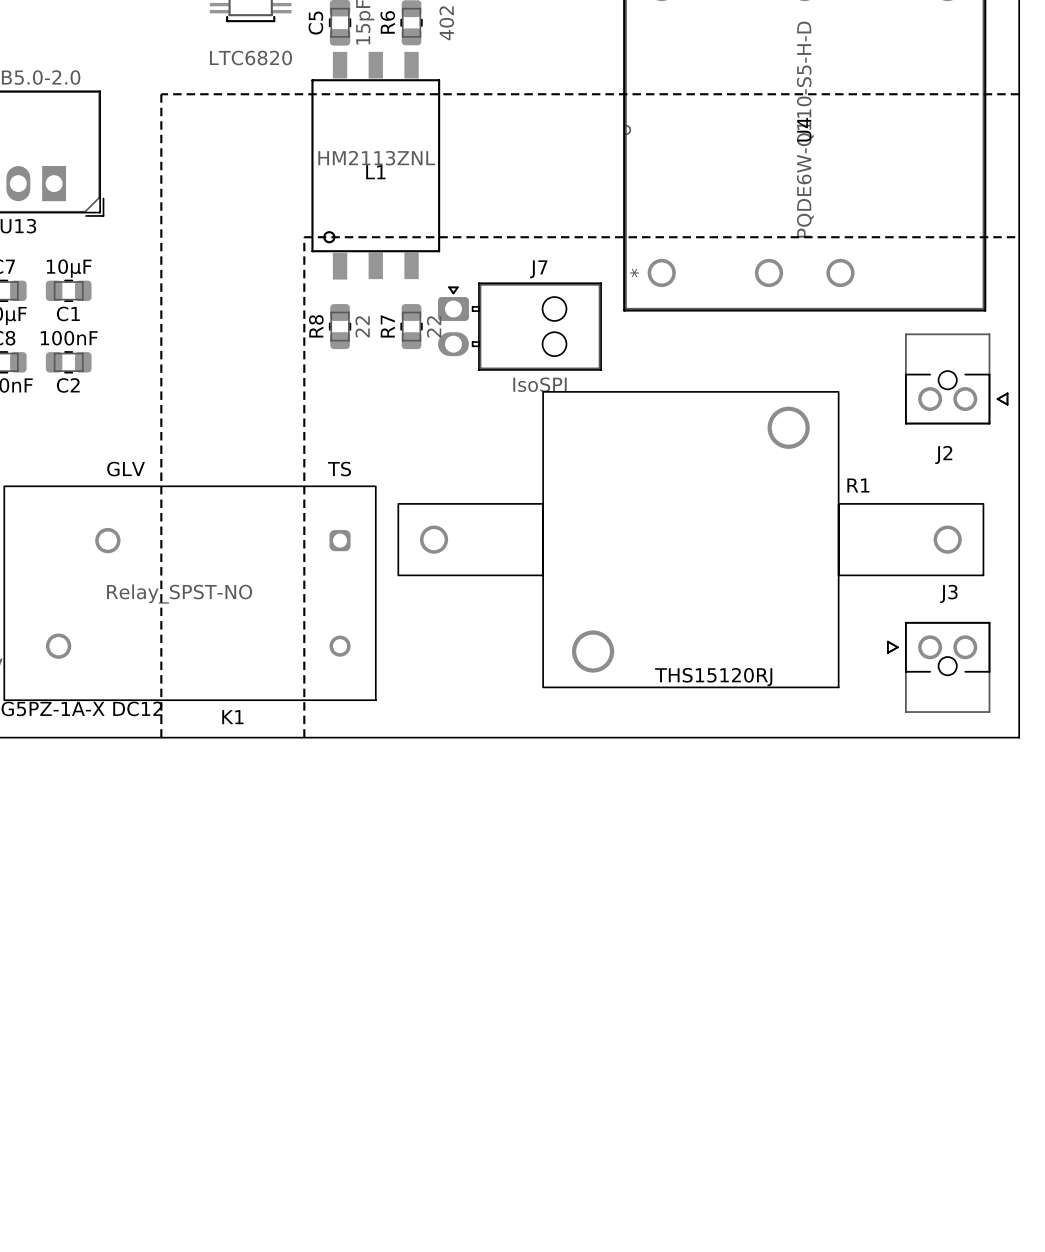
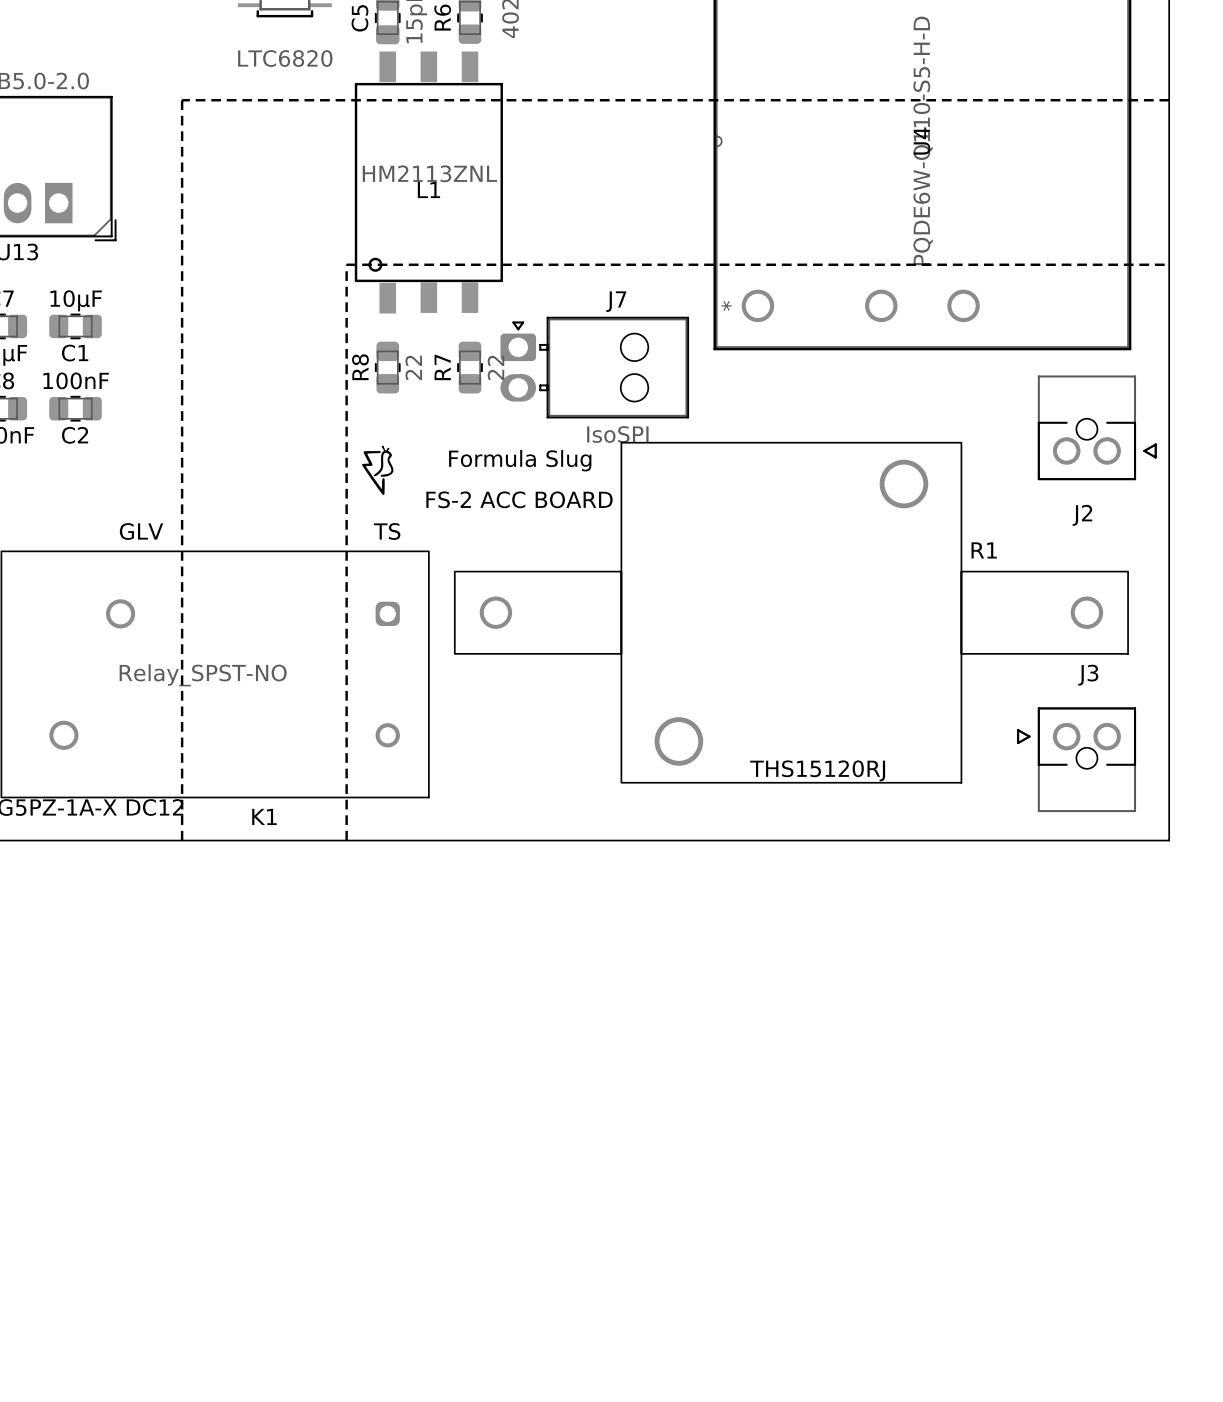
drawing: none -> [361, 445, 394, 496]
text: none -> Formula Slug (520, 460)
text: none -> FS-2 ACC BOARD (519, 499)

